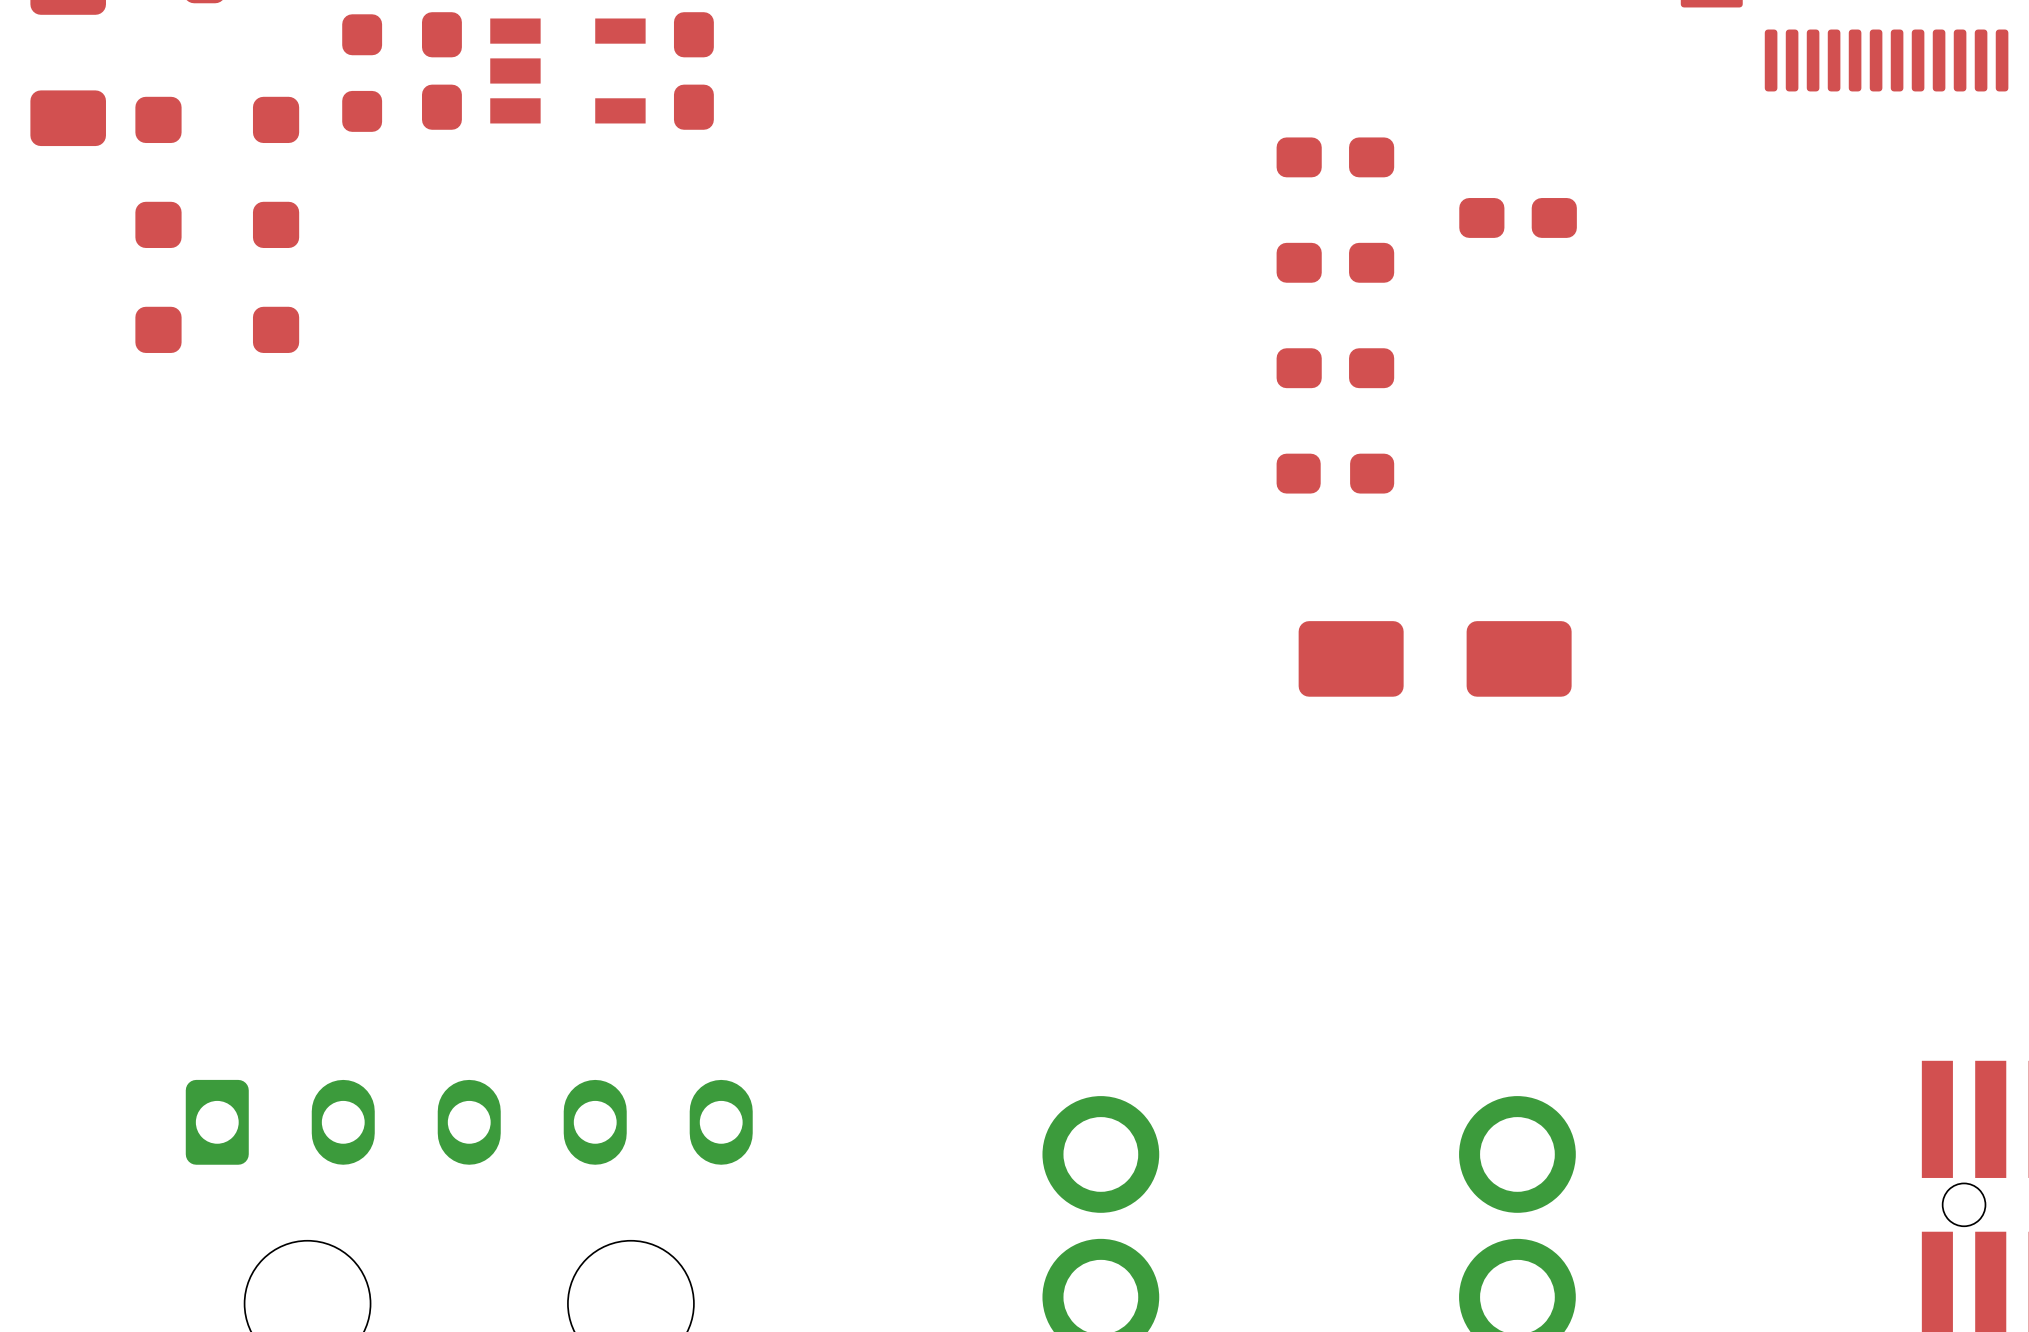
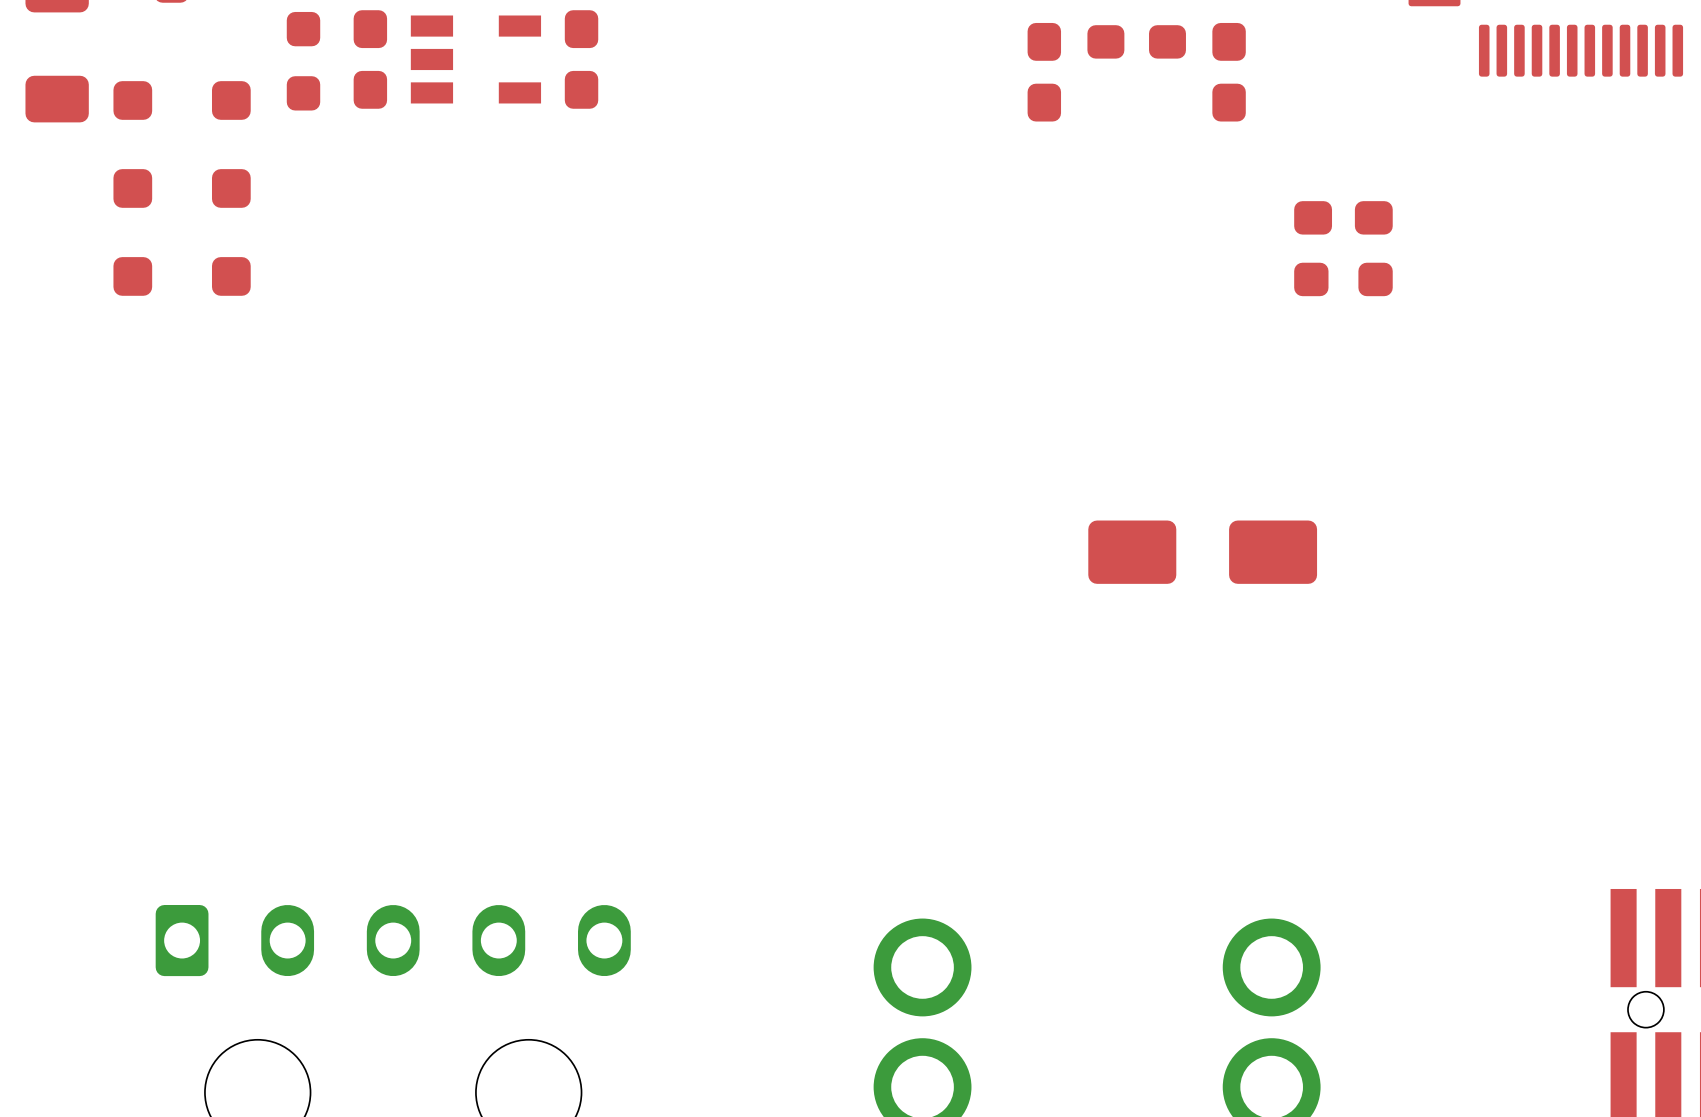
part: none -> (1044, 72)
part: none -> (1229, 72)
part: (1335, 157) -> none
part: (1518, 217) -> none
part: none -> (1343, 217)
part: (1335, 262) -> none
part: none -> (1343, 279)
part: (1335, 368) -> none
part position: (1335, 473) -> (1136, 41)

